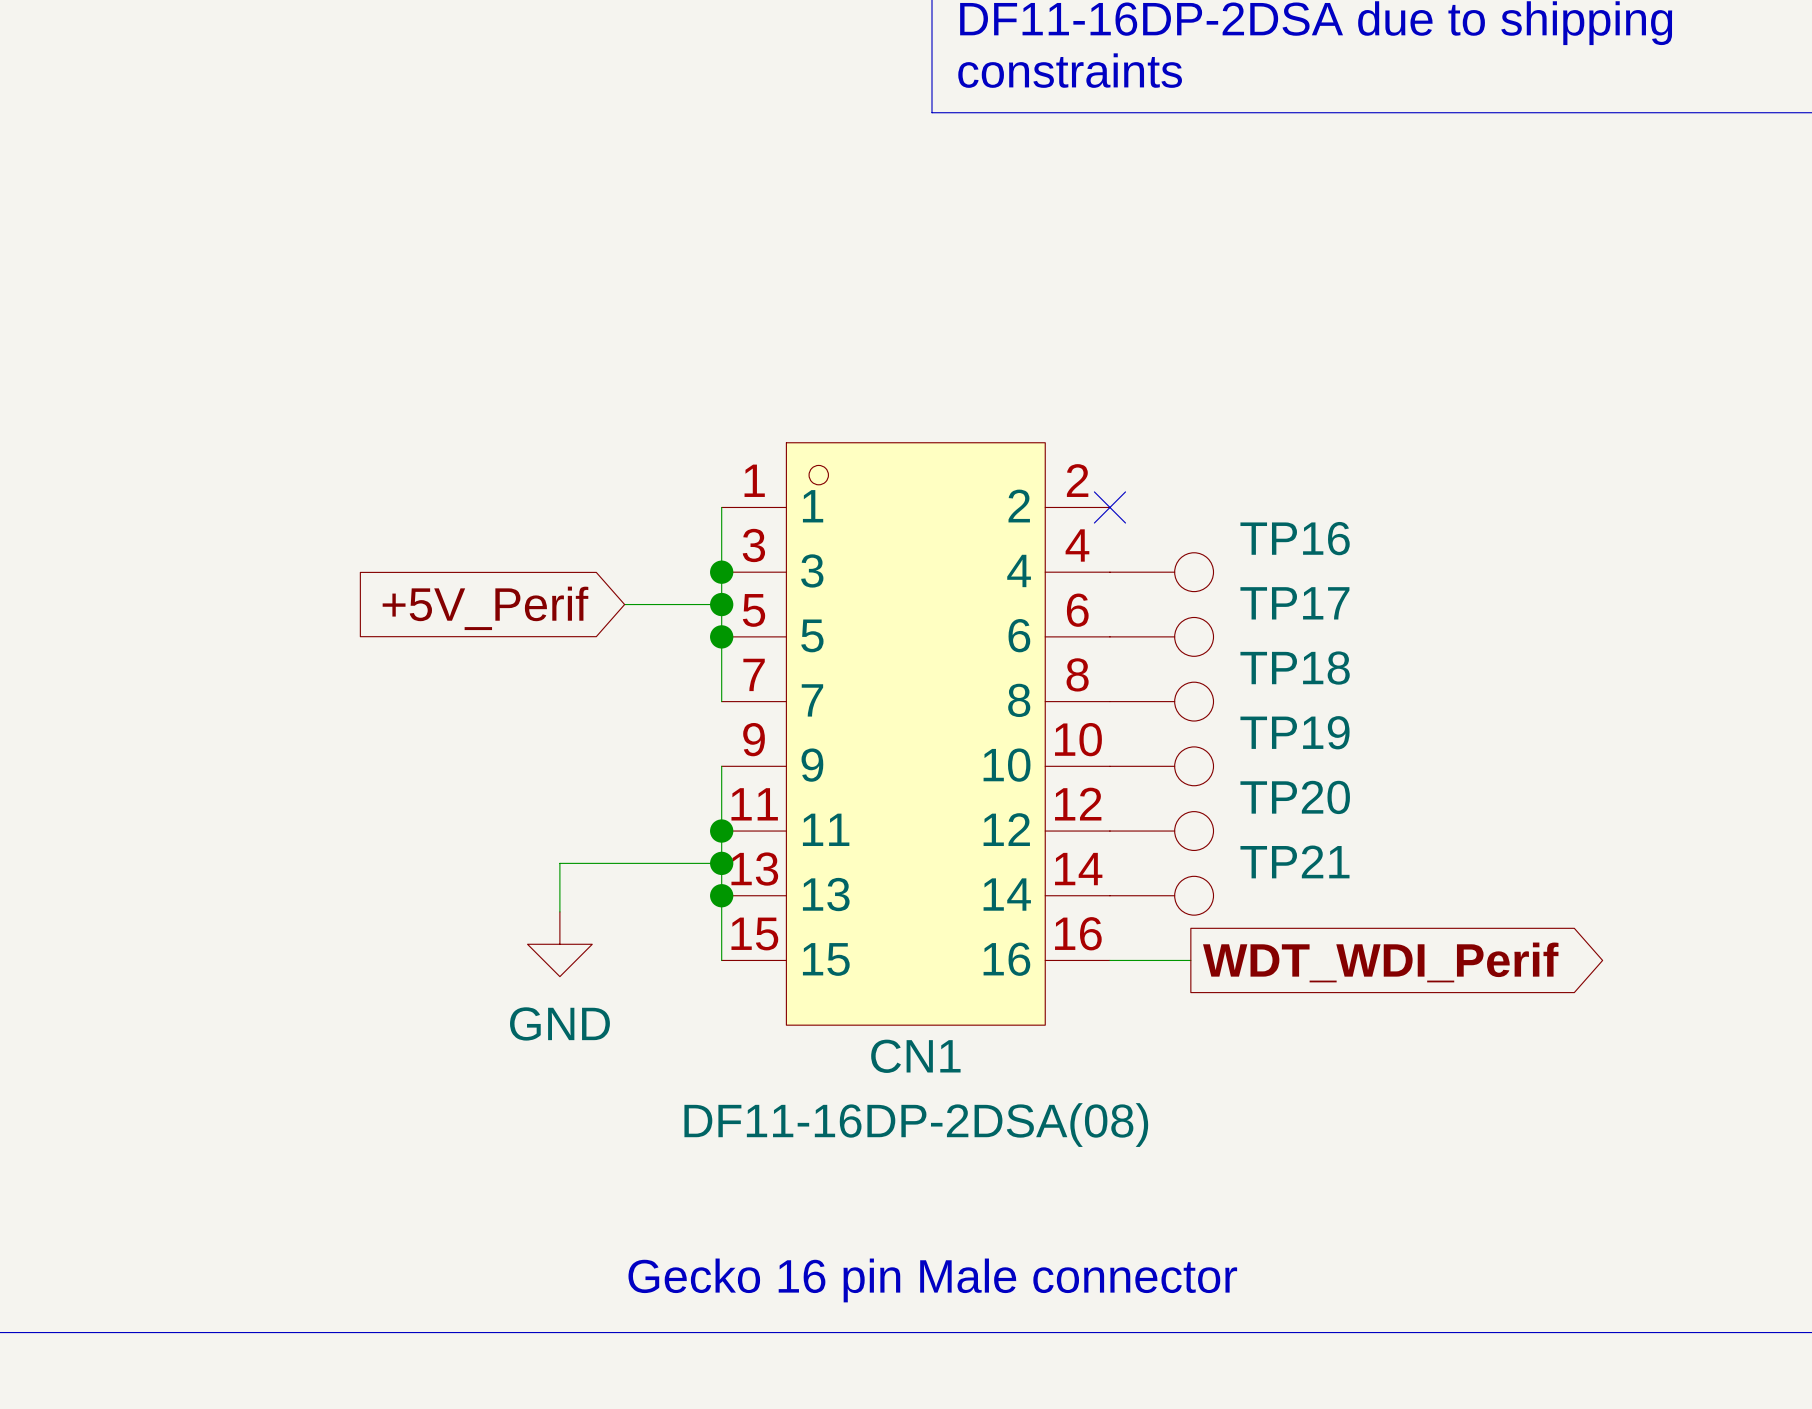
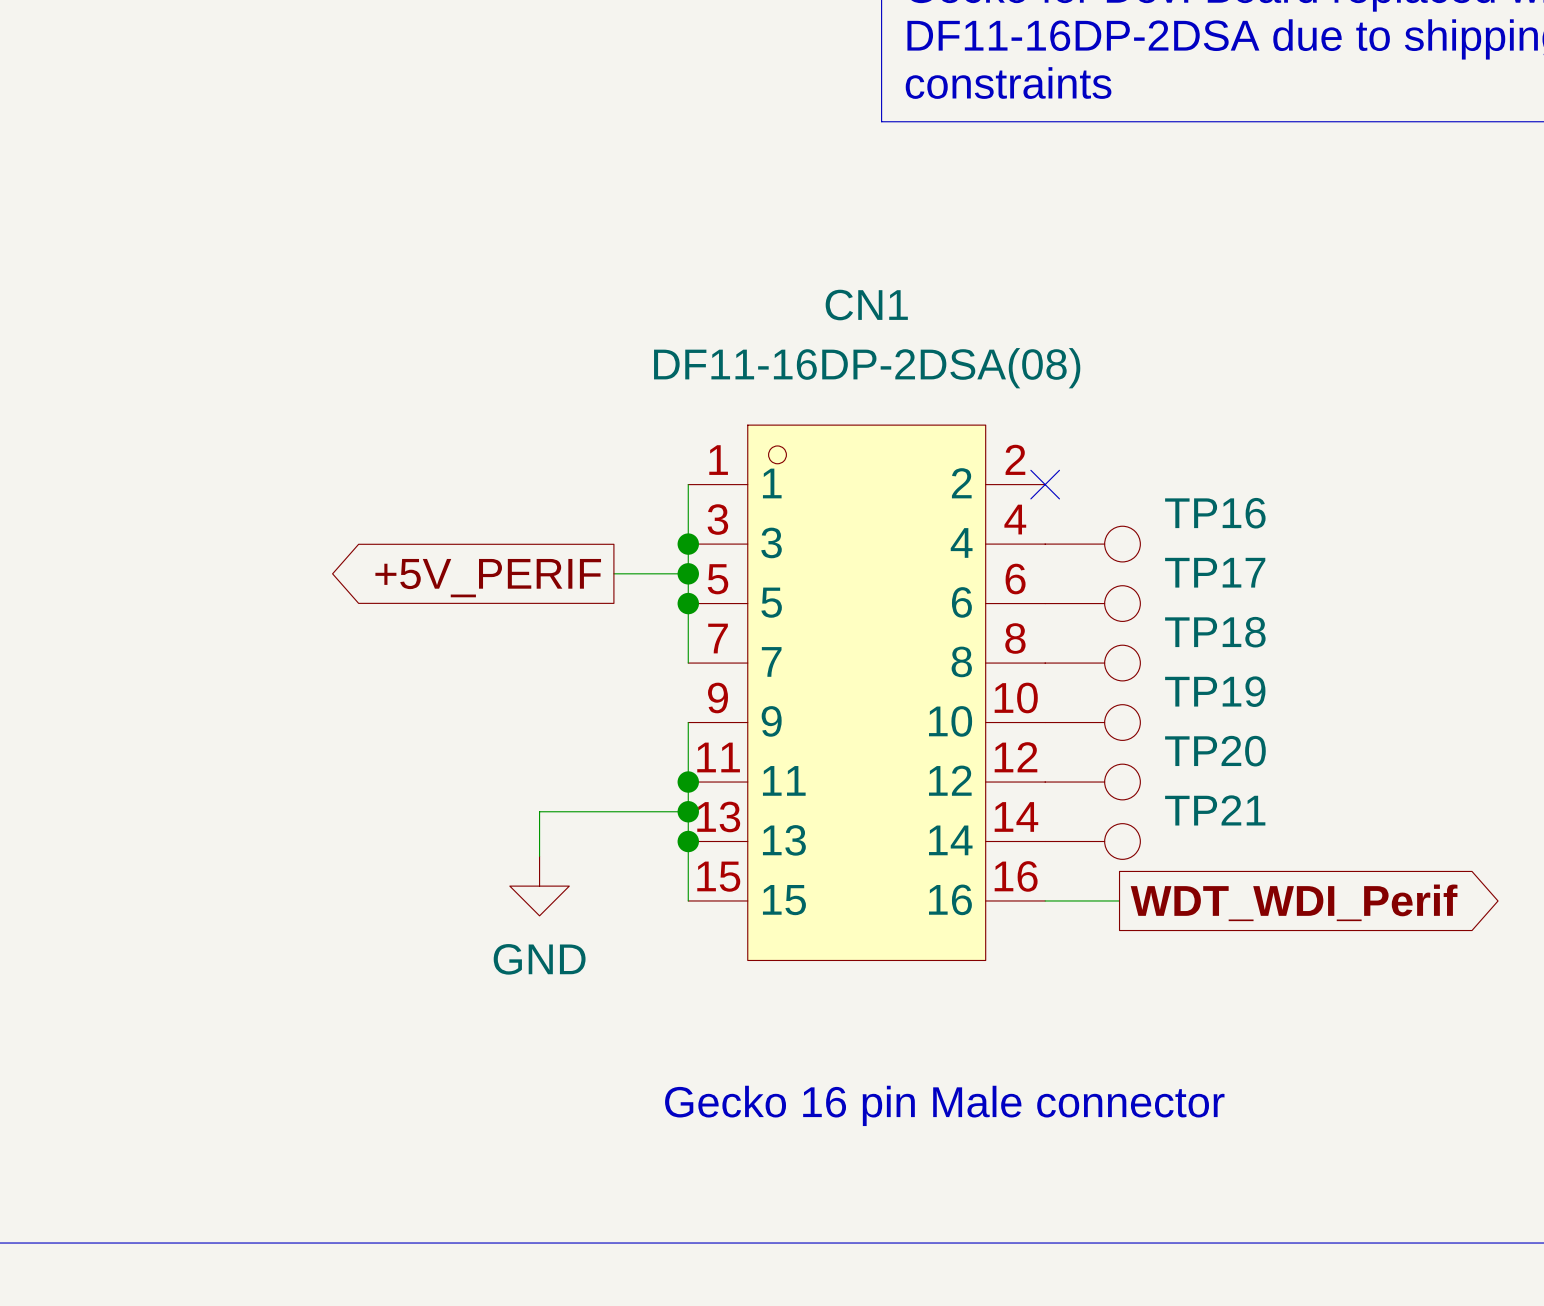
wire: (624, 604) (640, 604) -> none
global label shape: input (485, 608) -> output (488, 578)
global label: +5V_Perif (485, 608) -> +5V_PERIF (488, 578)
CN1 name position: CN1 (915, 1056) -> CN1 (866, 305)
CN1 value position: DF11-16DP-2DSA(08) (916, 1125) -> DF11-16DP-2DSA(08) (867, 368)
text position: Gecko 16 pin Male connector (932, 1280) -> Gecko 16 pin Male connector (944, 1105)

